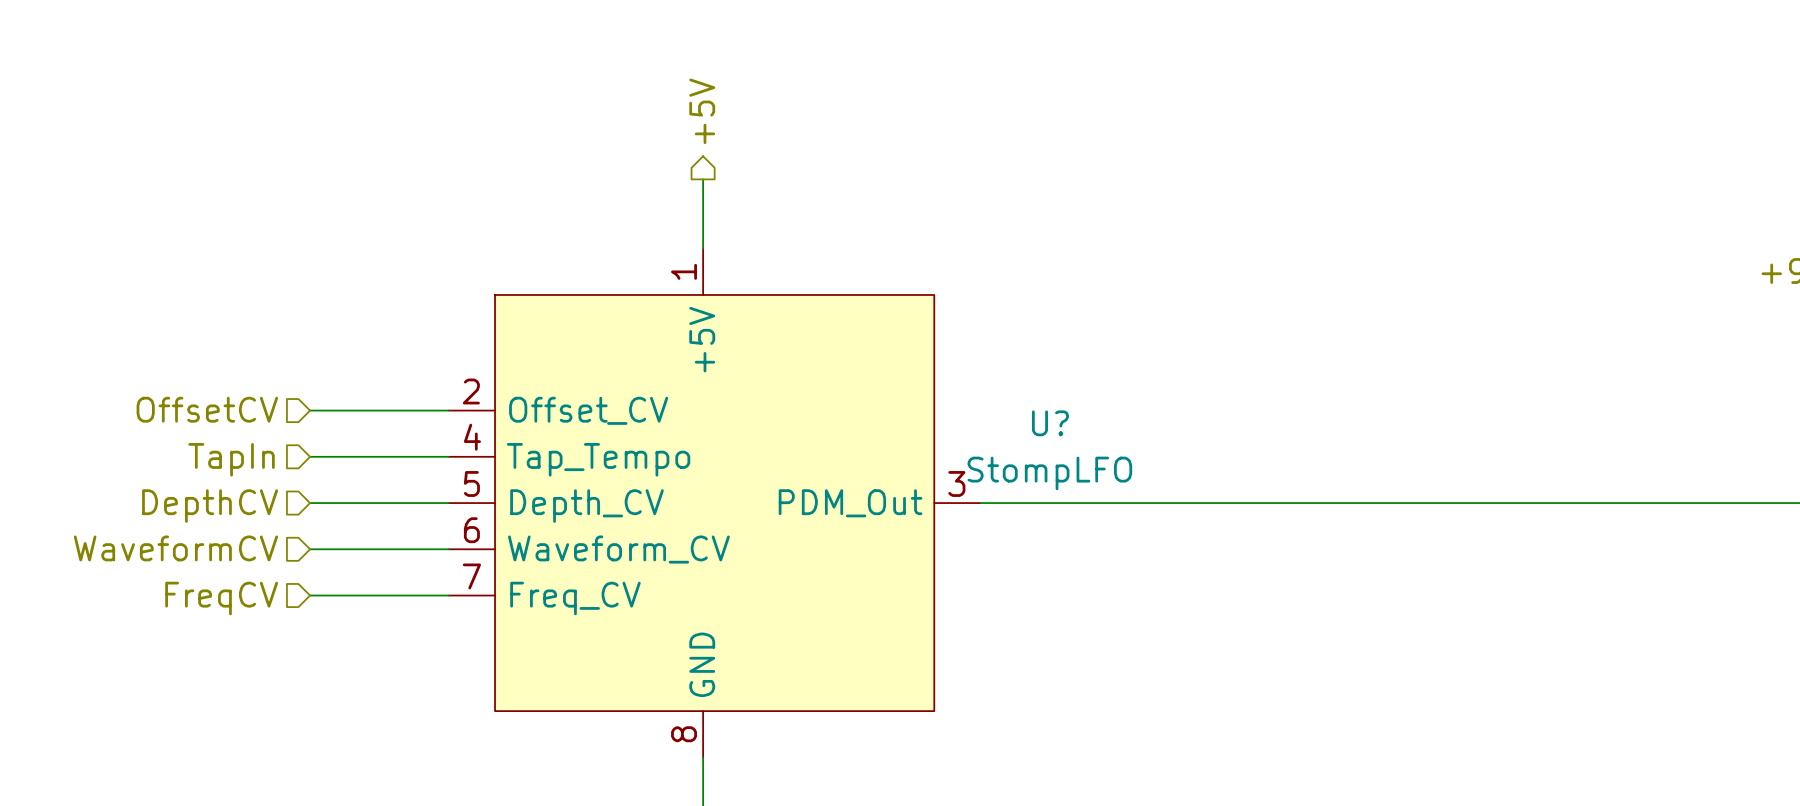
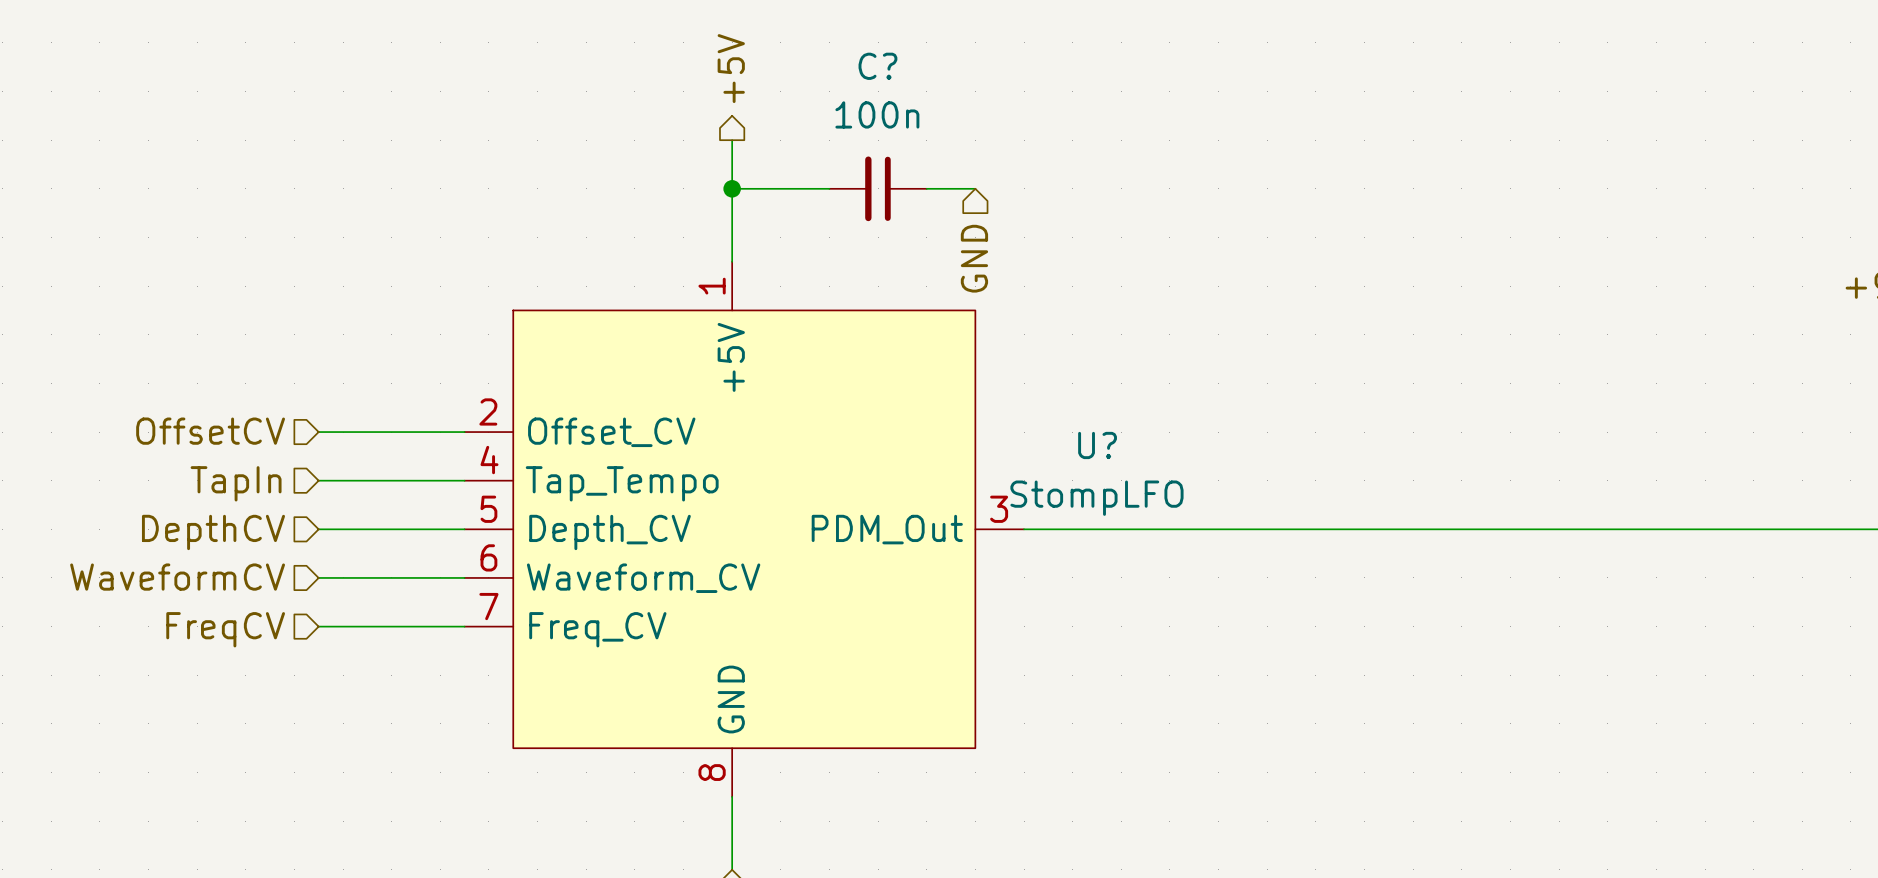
hierarchical label position: +5V (702, 111) -> +5V (731, 68)
wire: none -> (732, 140) (732, 188) (829, 188)
junction: none -> (732, 188)
C?: none -> 100n (878, 188)
wire: none -> (926, 188) (975, 188)
hierarchical label: none -> GND (974, 258)

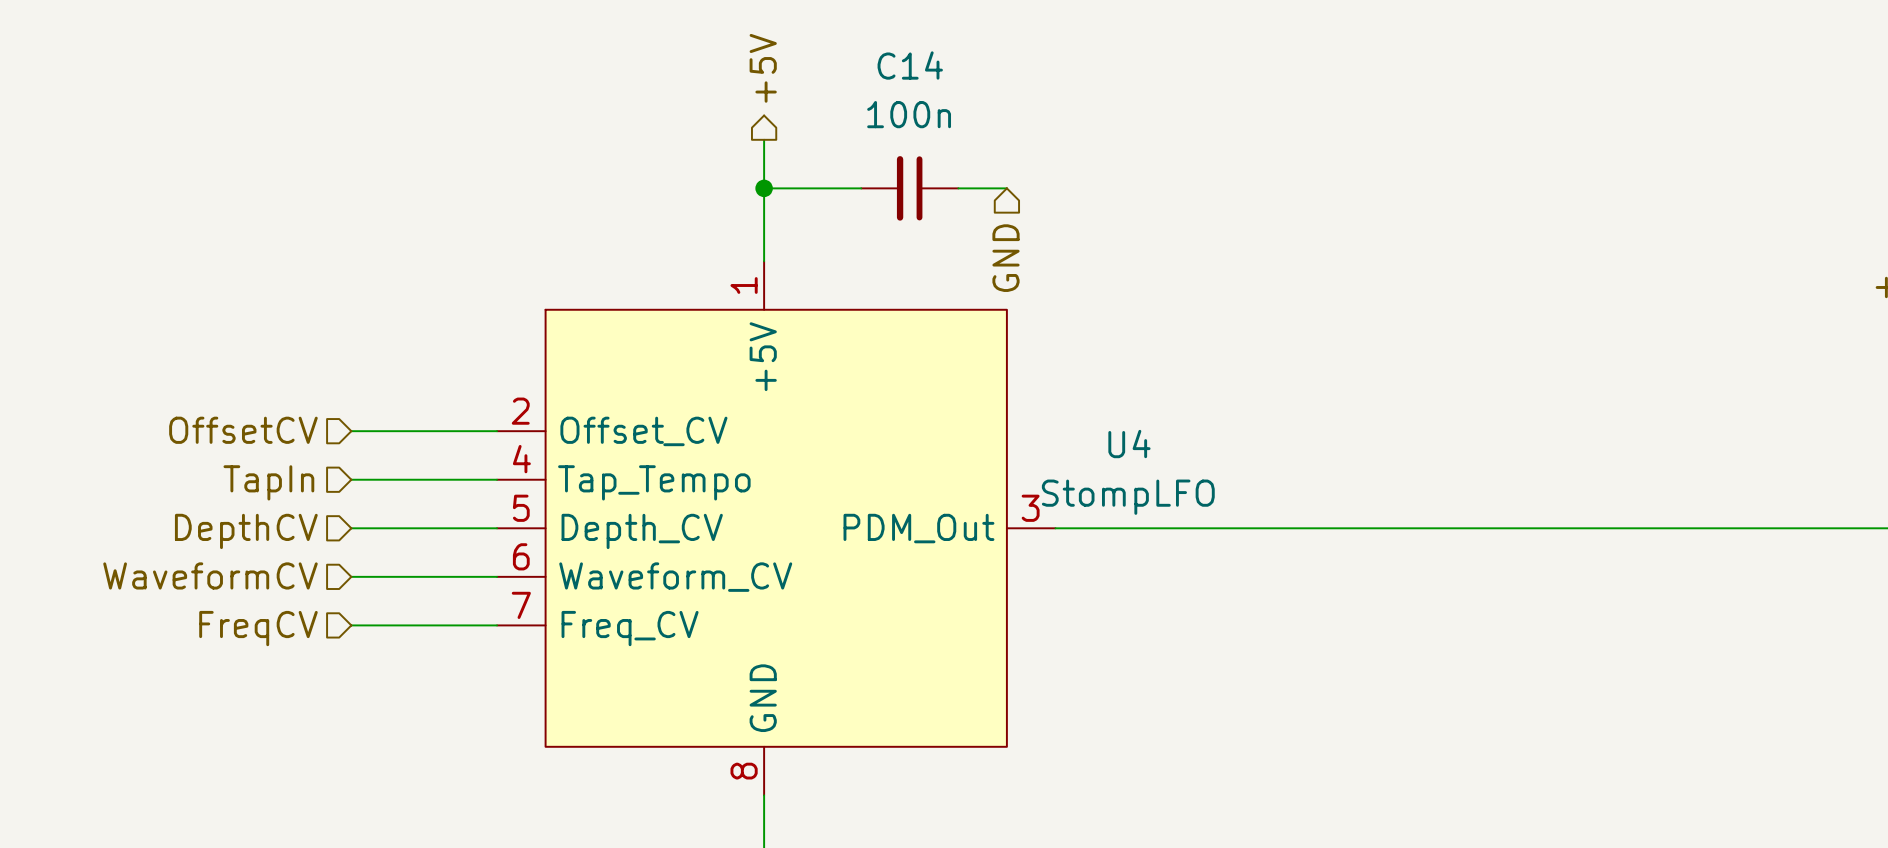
C? name: C? (877, 66) -> C14 (910, 65)
U? name: U? (1097, 445) -> U4 (1129, 444)

